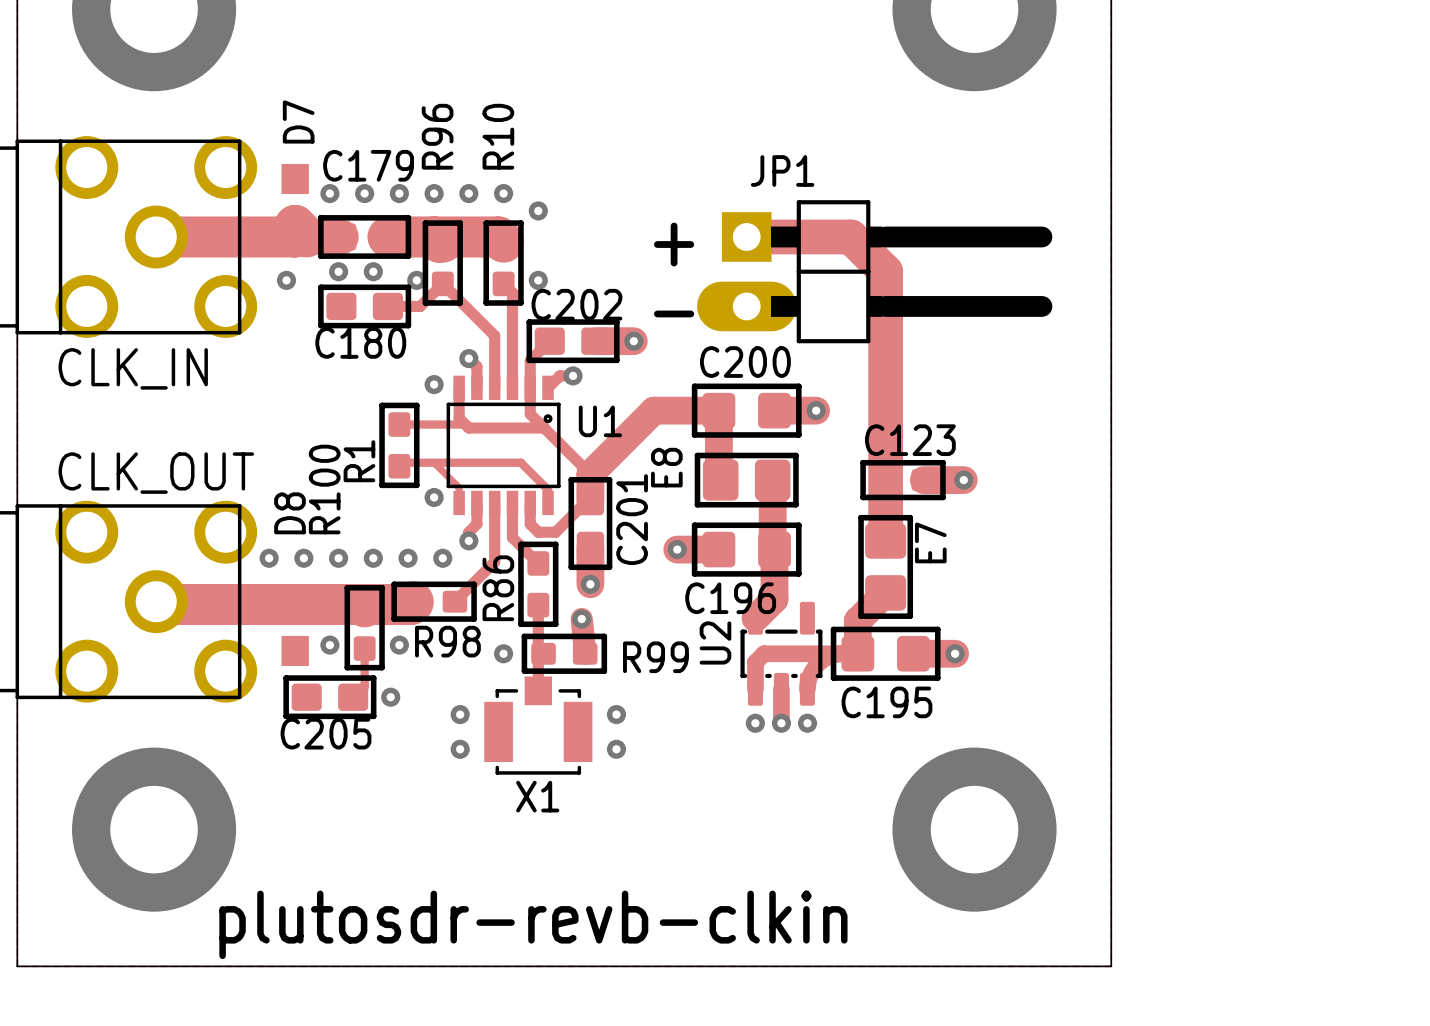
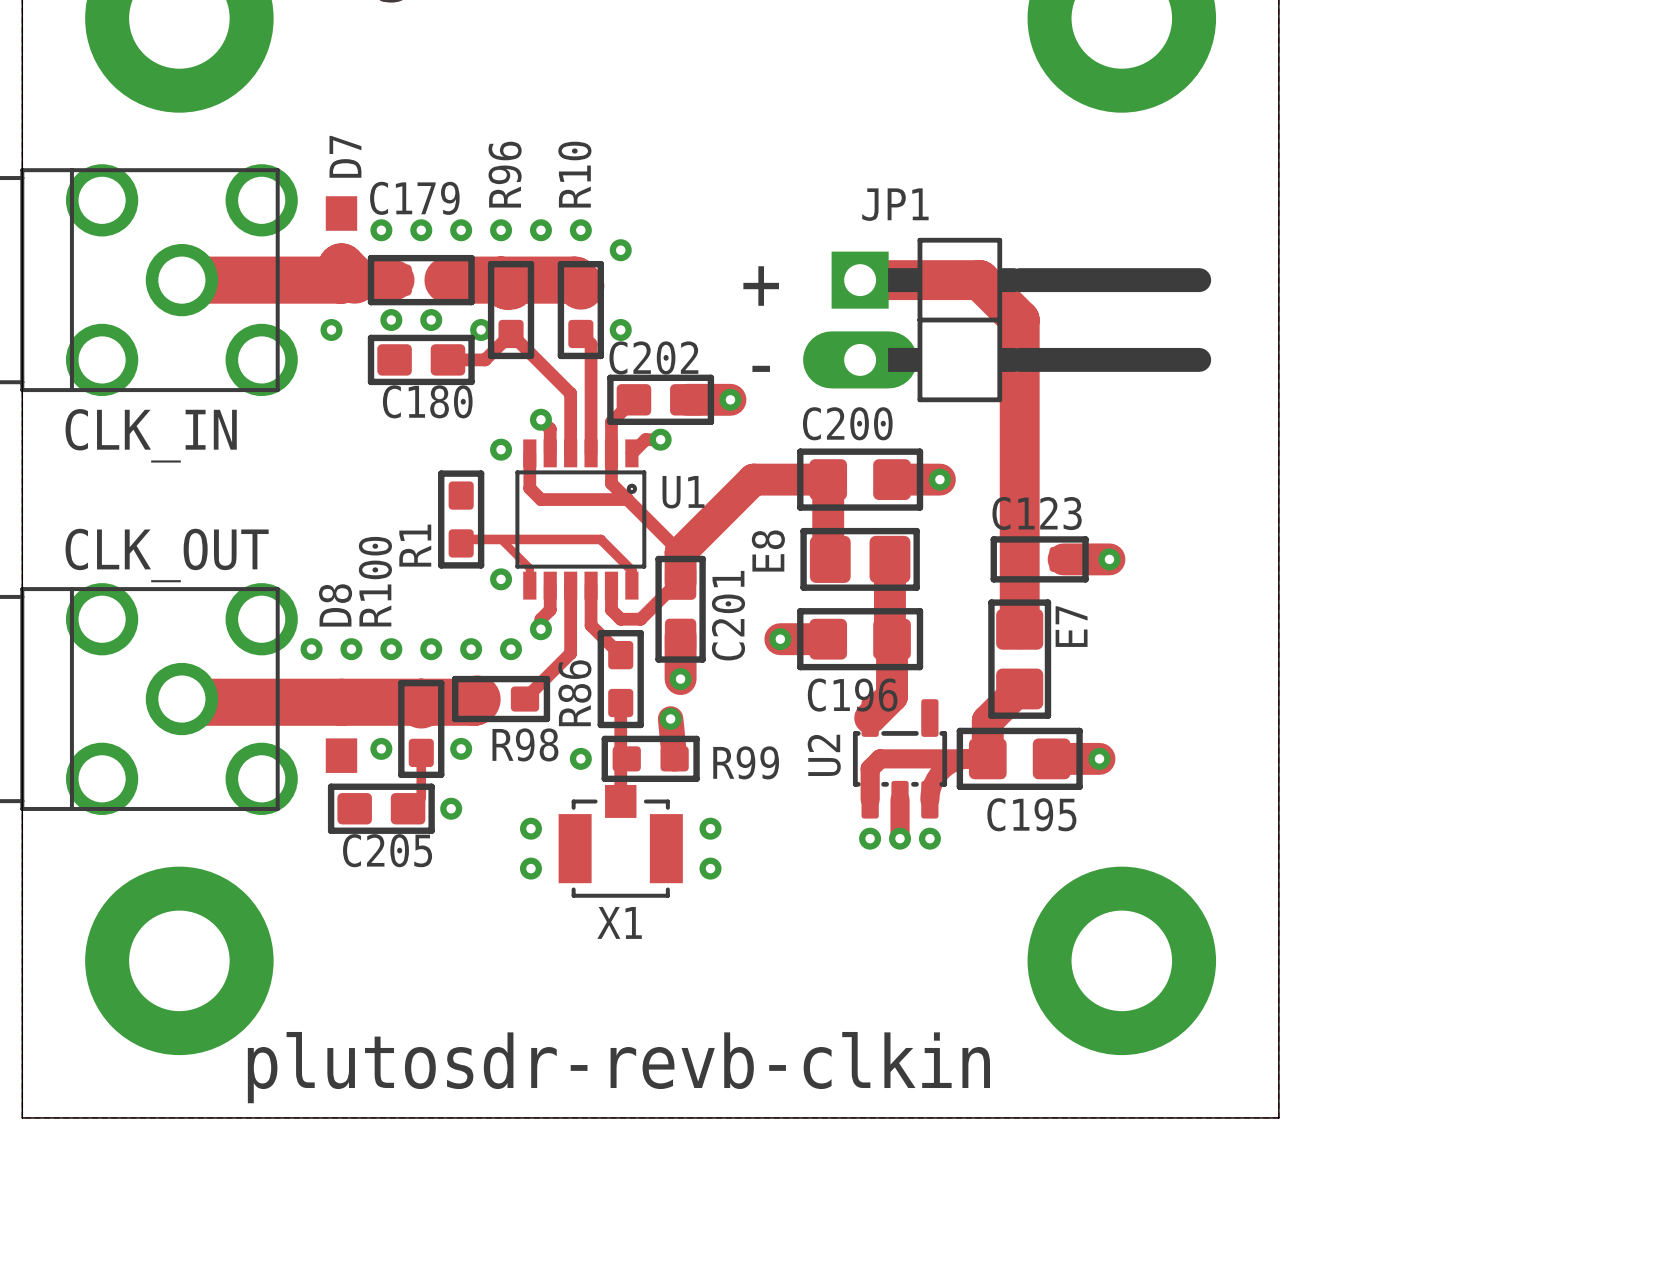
track: (399, 424) (465, 424) -> none

